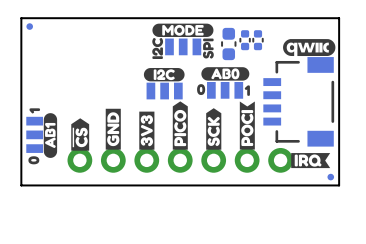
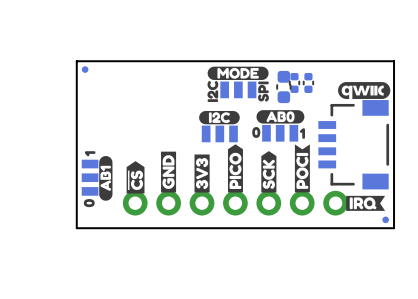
part: none -> (294, 82)
part: (245, 40) -> none
part: none -> (308, 83)
part: (258, 40) -> none

